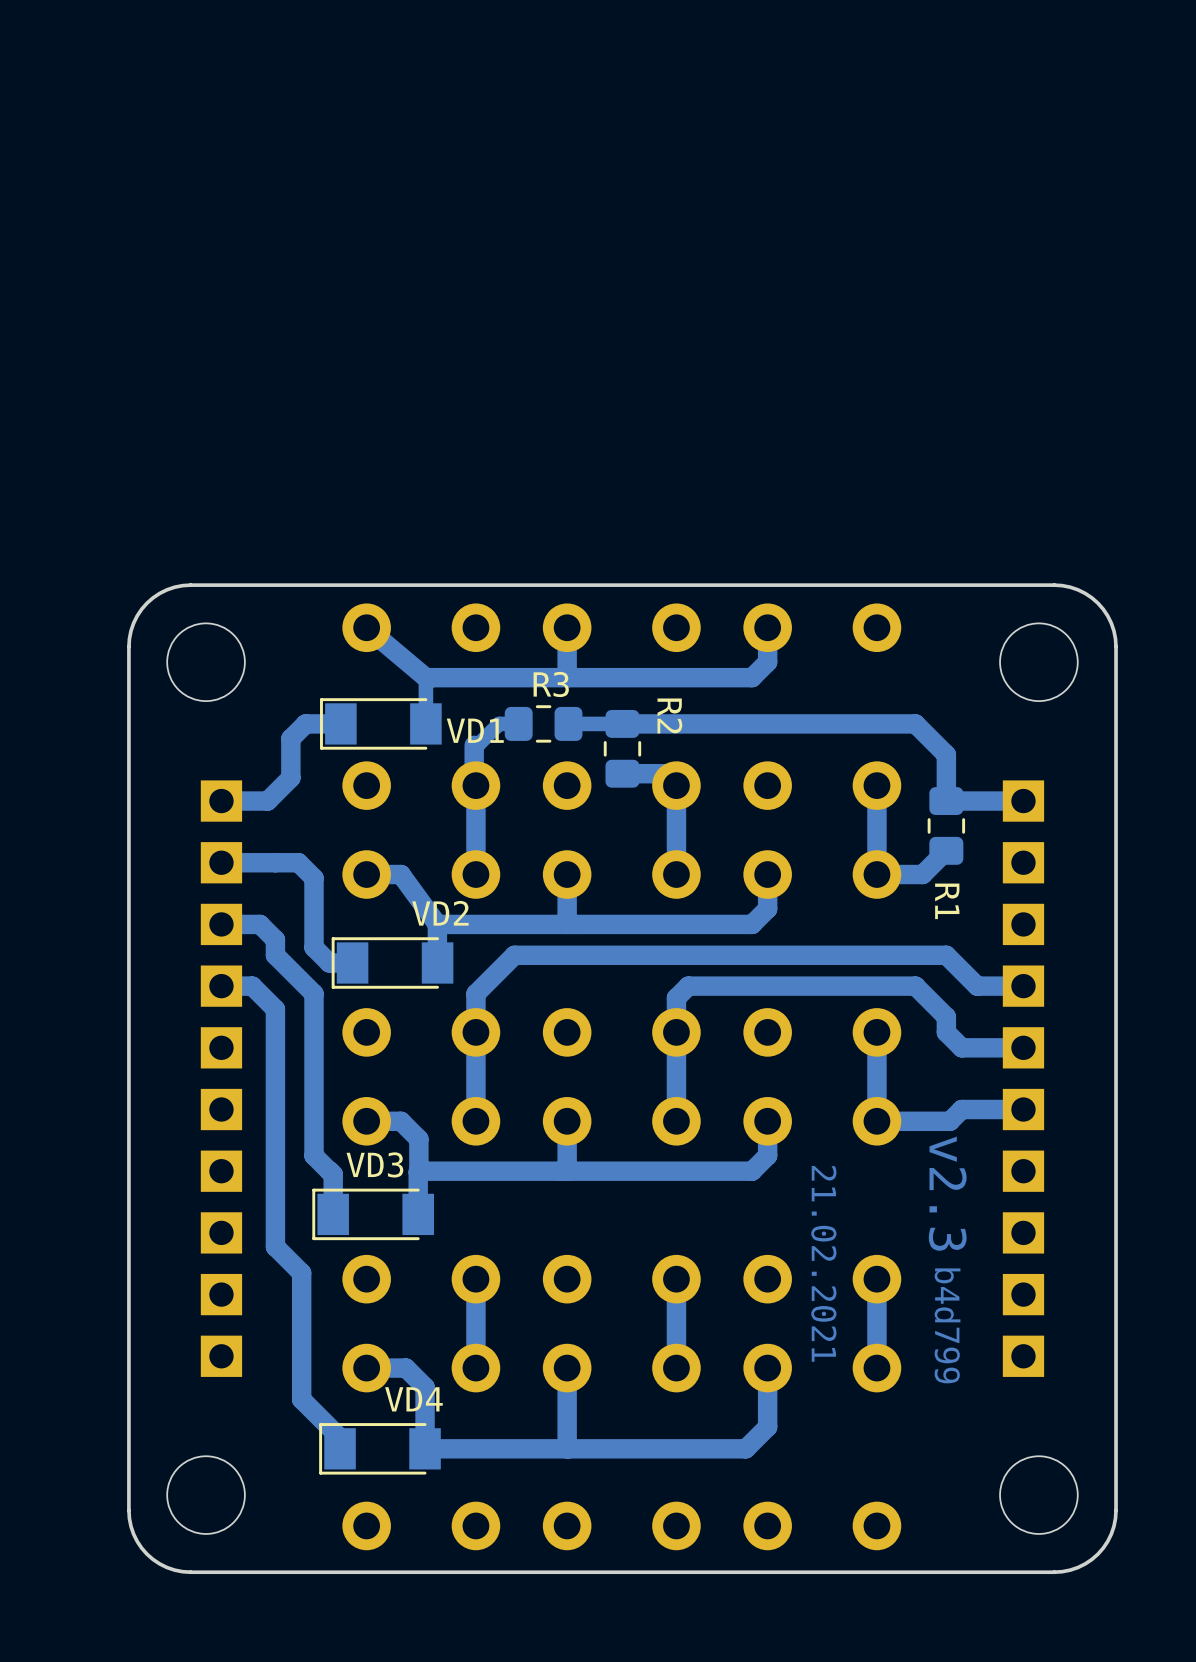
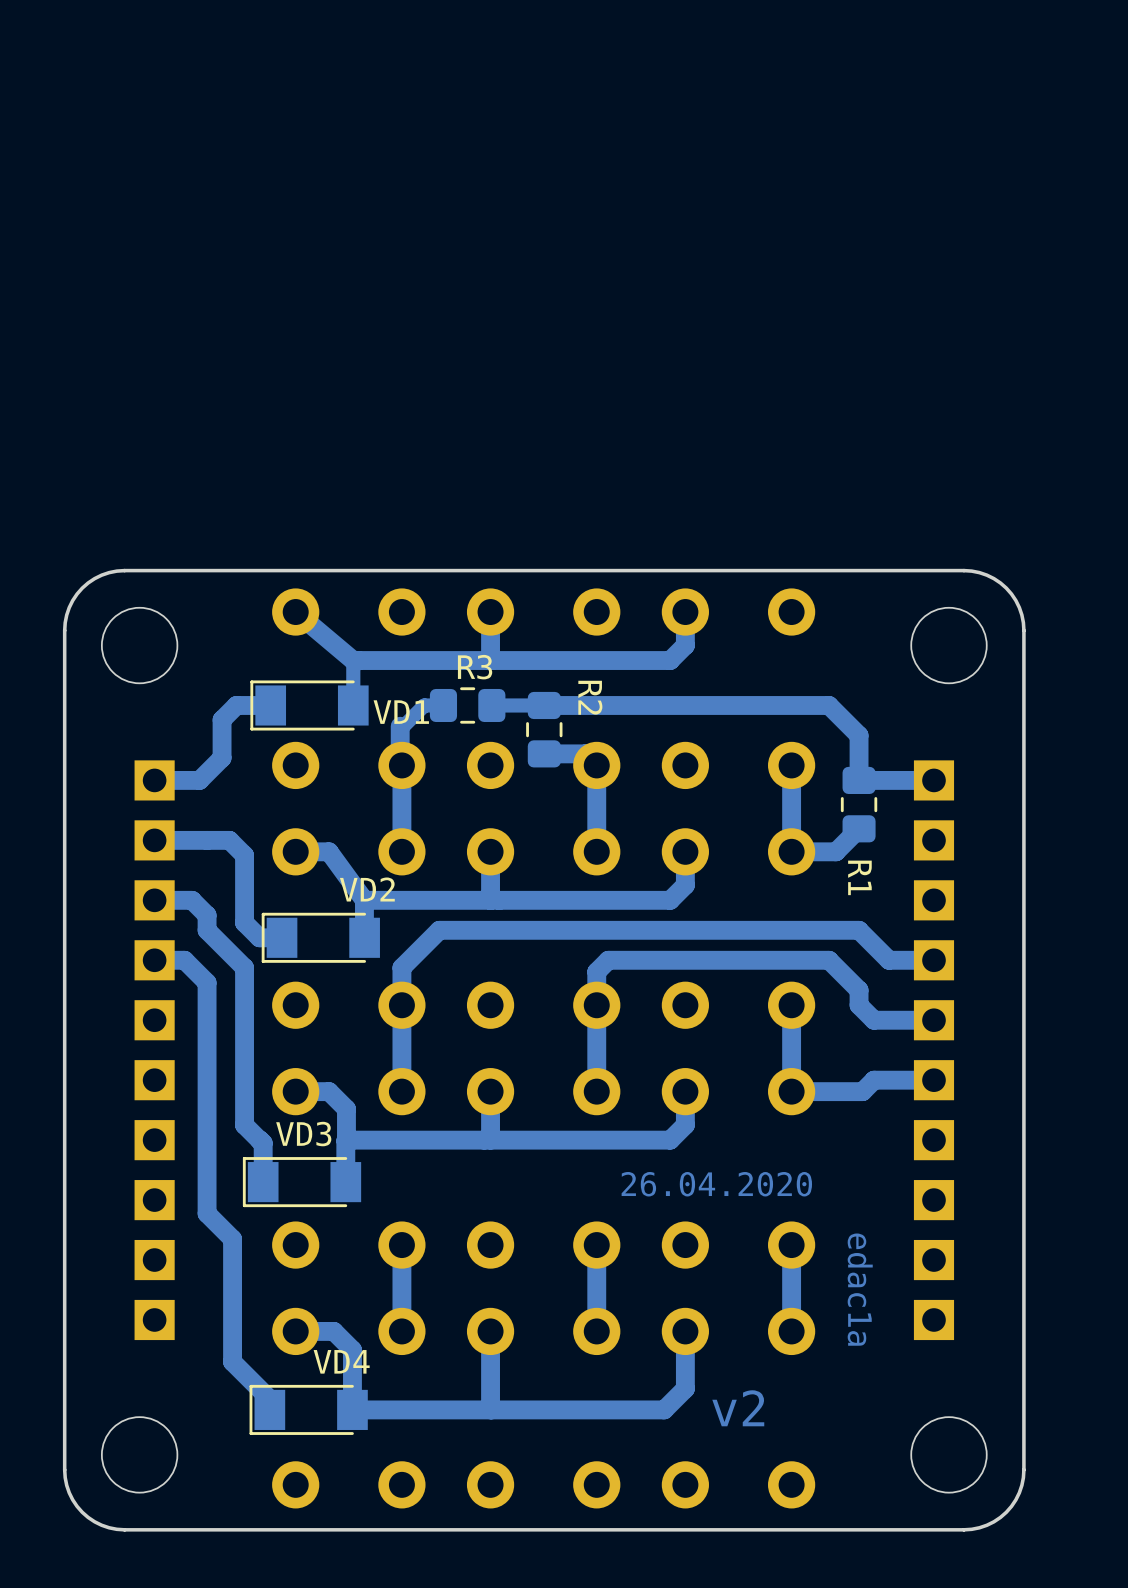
text: v2.3 (947, 1193) -> none
text: 21.02.2021 (823, 1263) -> 26.04.2020 (716, 1184)
text: b4d799 (947, 1325) -> edac1a (860, 1289)
text: none -> v2 (738, 1408)

